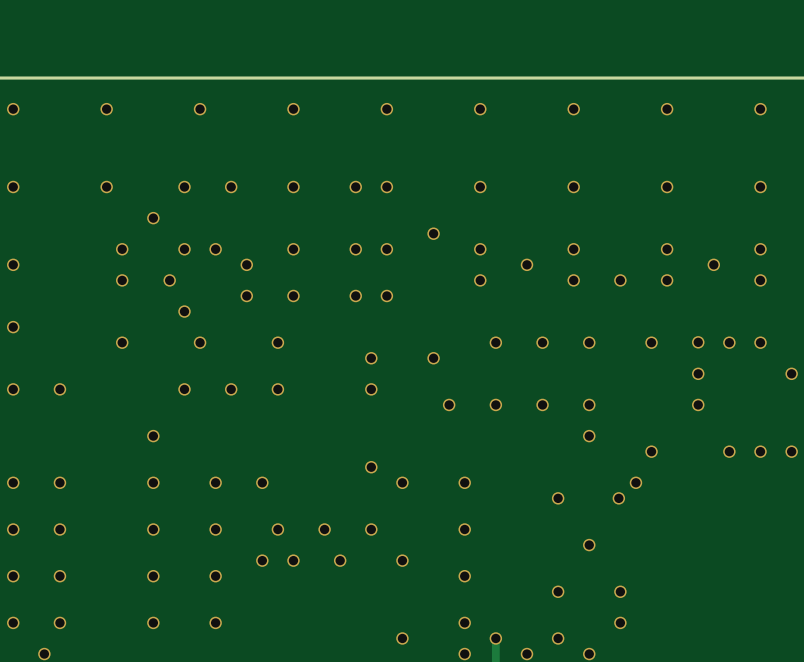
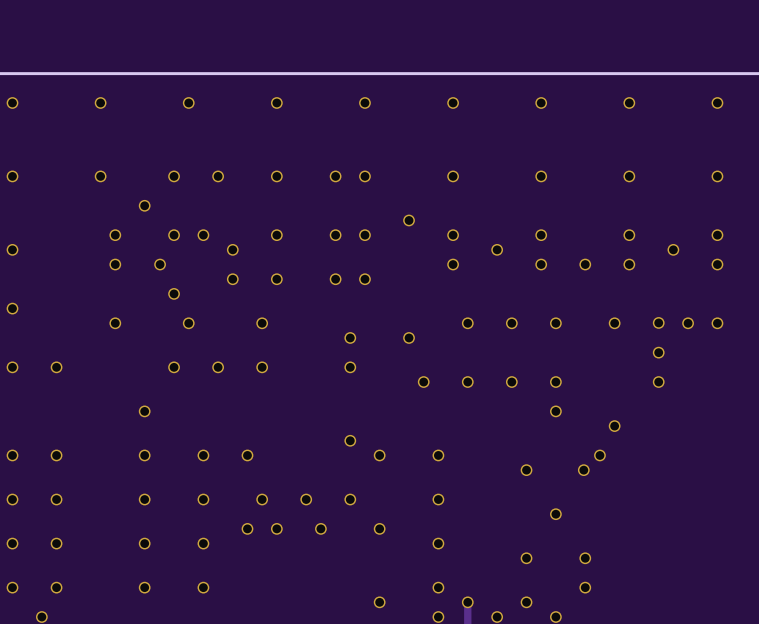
via: (791, 373) -> none
via: (729, 451) -> none
via: (760, 451) -> none
via: (791, 451) -> none

